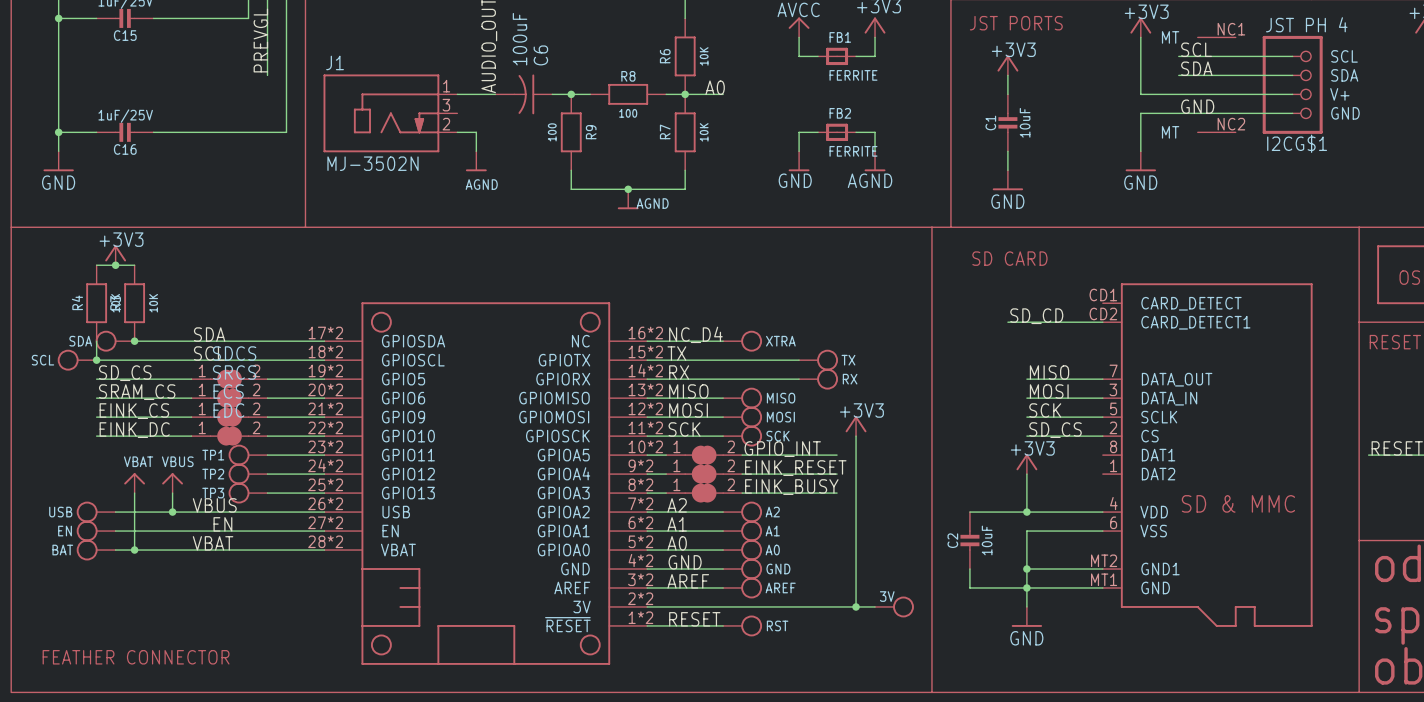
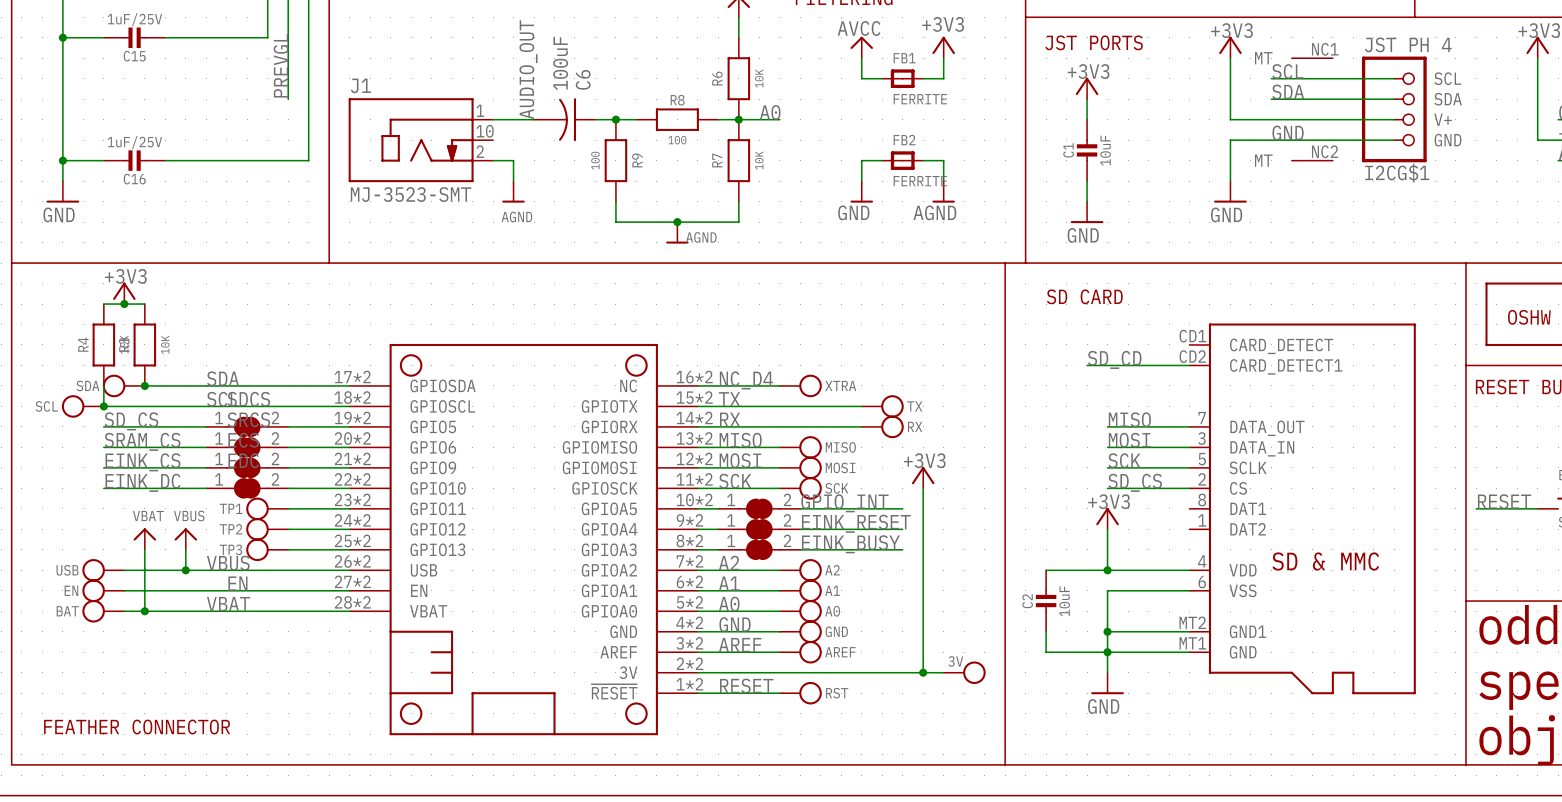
J1 pin number: 3 (446, 105) -> 10 (485, 131)
J1 value: MJ-3502N (372, 163) -> MJ-3523-SMT (411, 194)

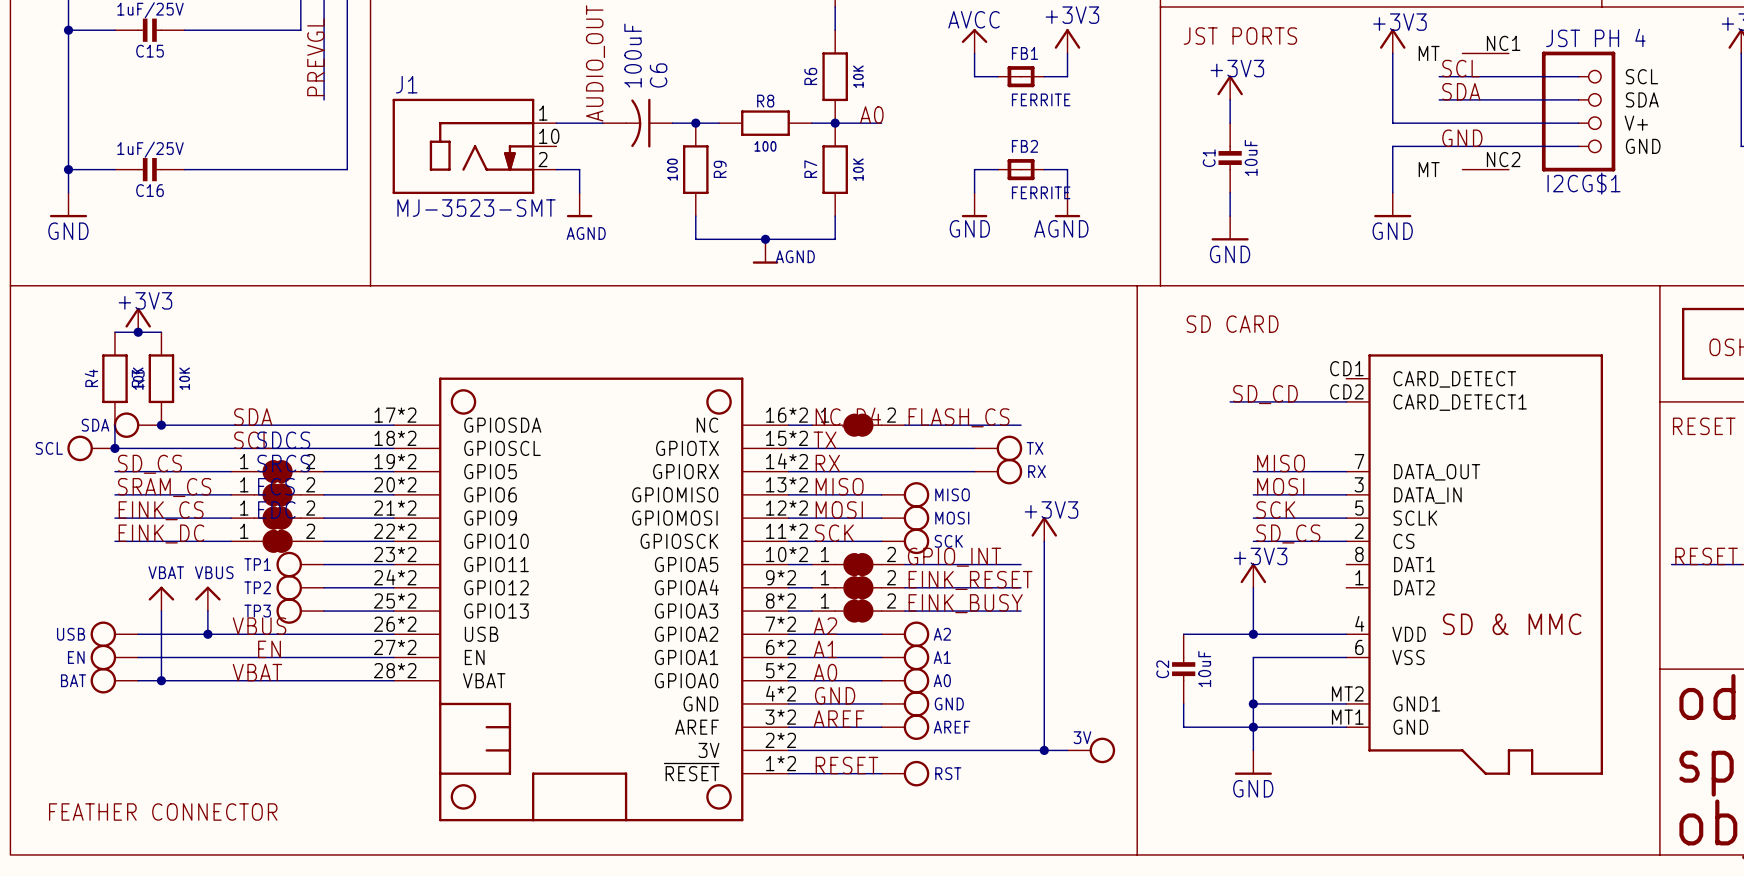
label: none -> FLASH_CS (959, 417)
part: none -> (858, 425)
wire: none -> (904, 425) (1021, 425)
XTRA: (800, 385) -> none

